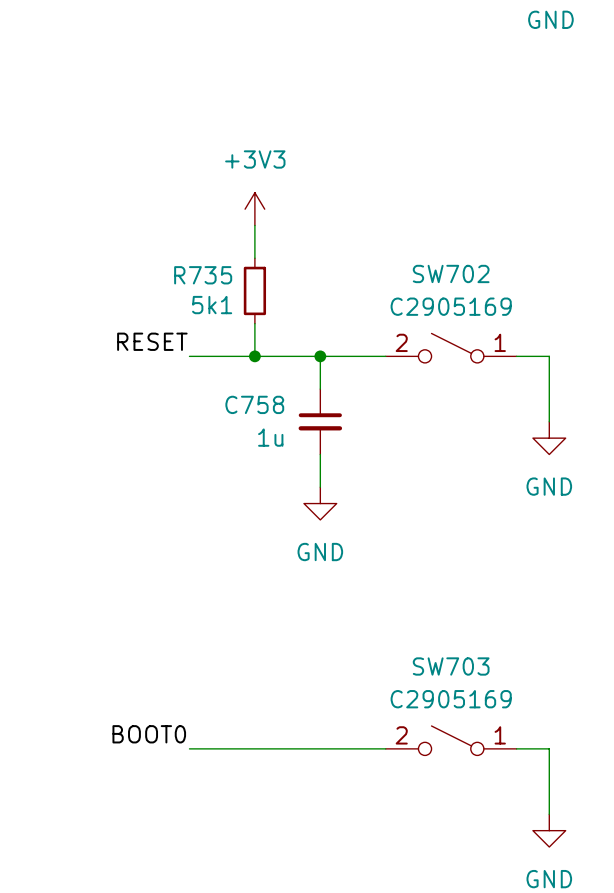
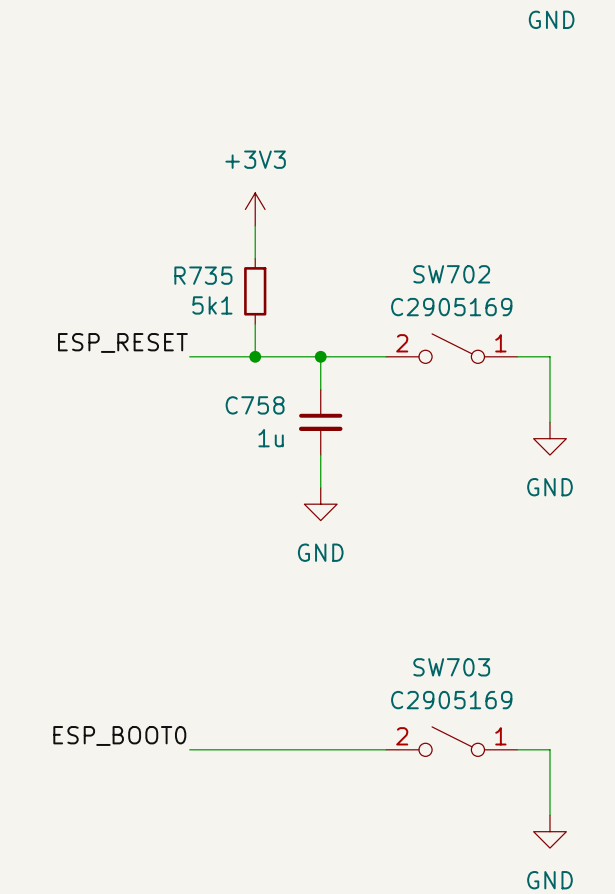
label: RESET (152, 341) -> ESP_RESET (122, 342)
label: BOOT0 (149, 734) -> ESP_BOOT0 (119, 735)

